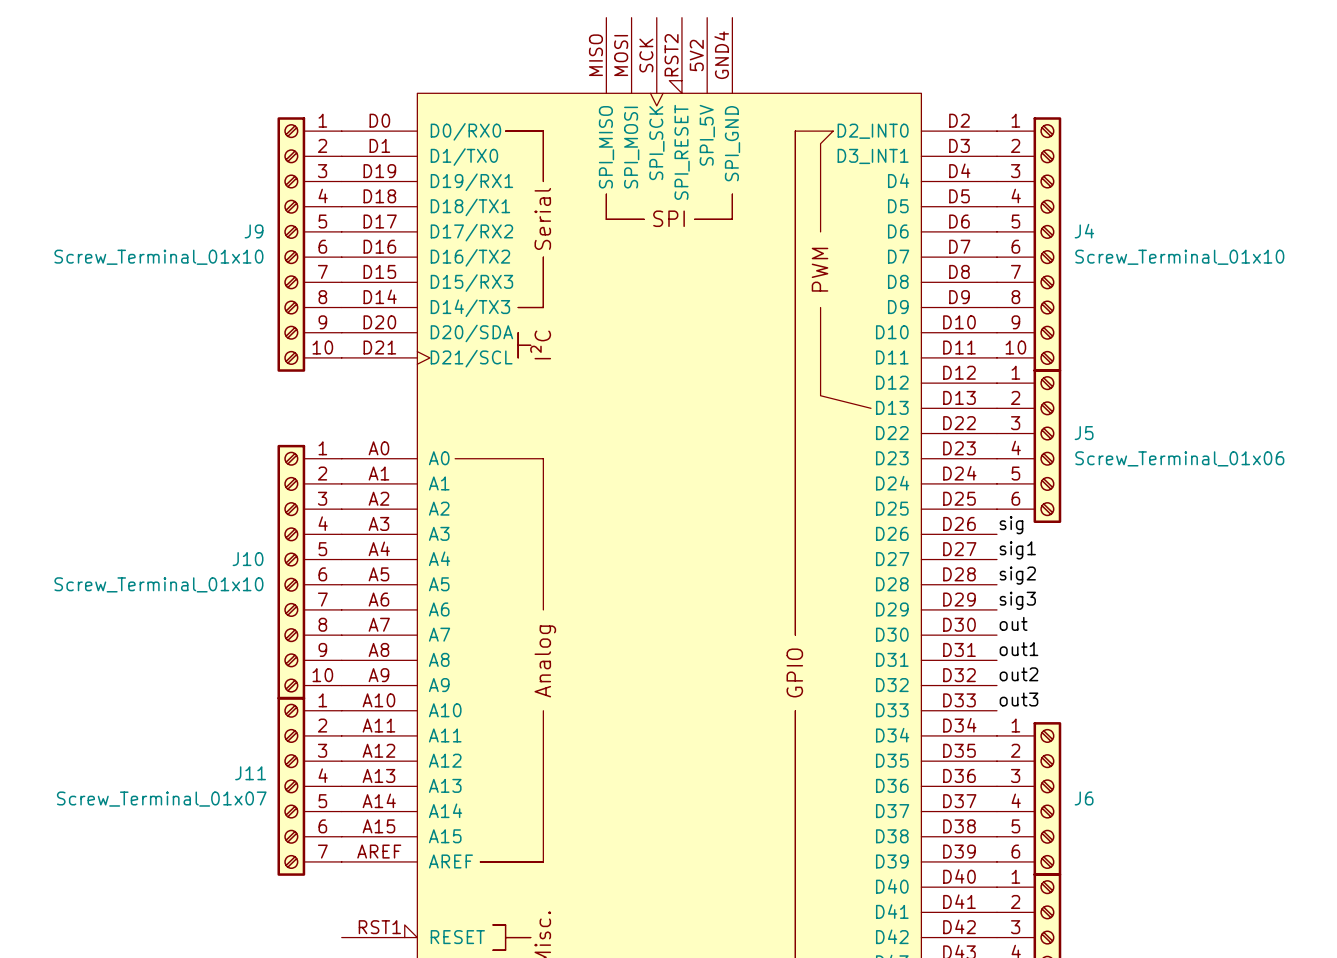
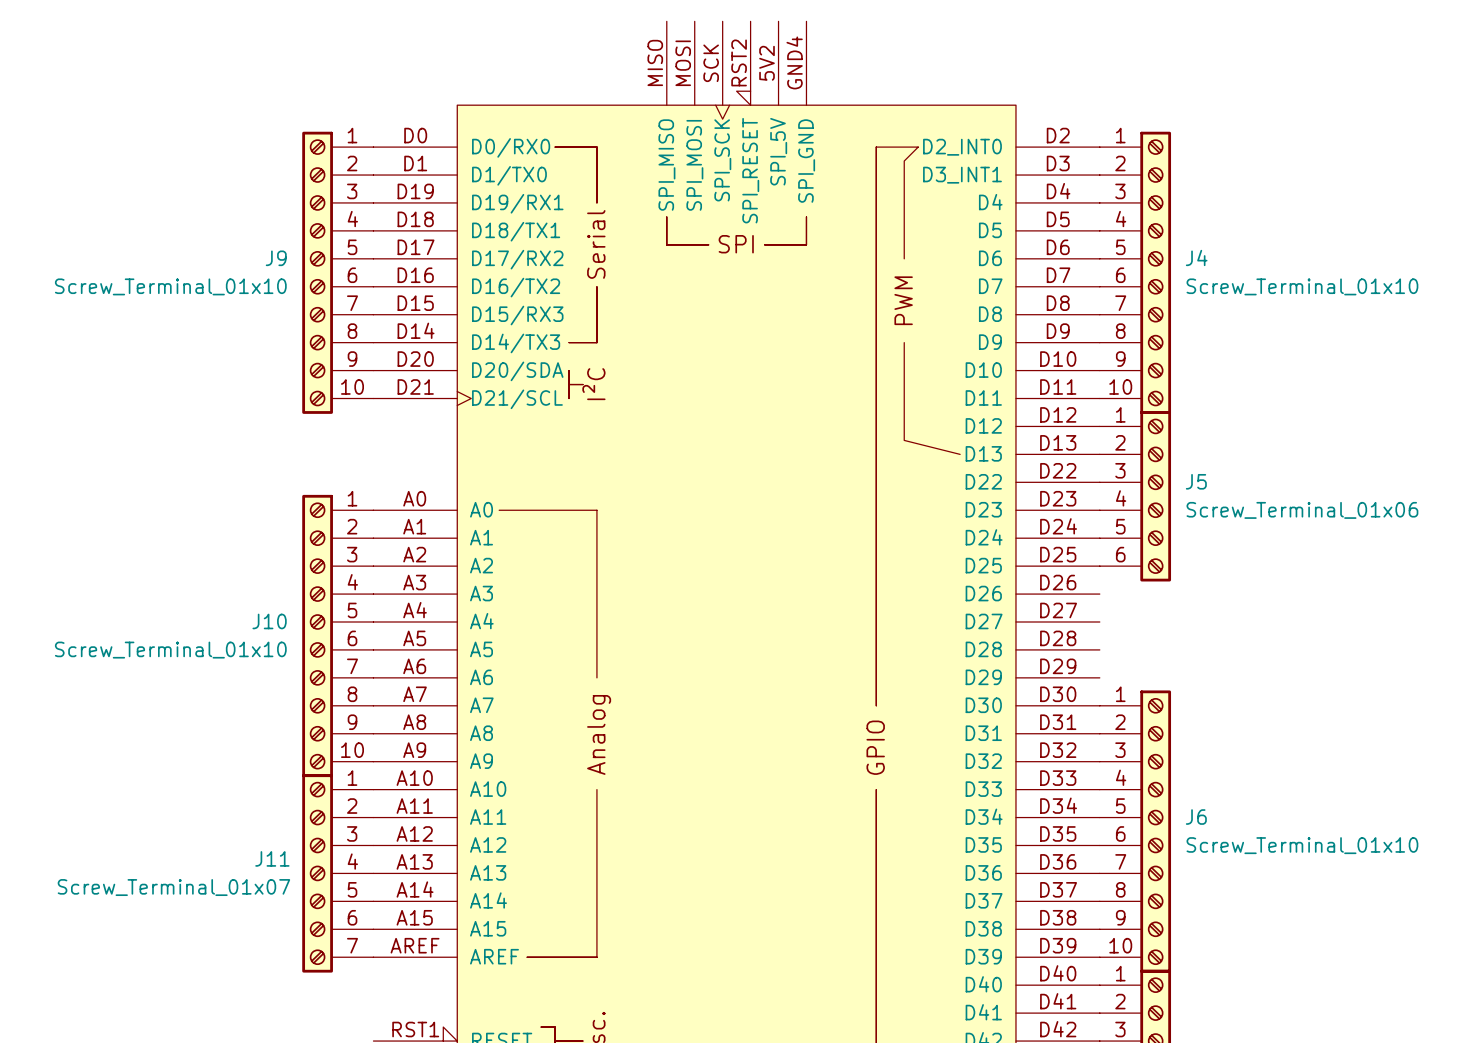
label: sig (1011, 525) -> none
label: sig1 (1017, 550) -> none
label: sig2 (1017, 575) -> none
label: sig3 (1017, 600) -> none
label: out (1013, 623) -> none
label: out1 (1018, 649) -> none
label: out2 (1018, 674) -> none
label: out3 (1018, 699) -> none
J6 symbol: [996, 722, 1062, 876] -> [1099, 690, 1172, 973]
J6 value: none -> Screw_Terminal_01x10 (1302, 845)

